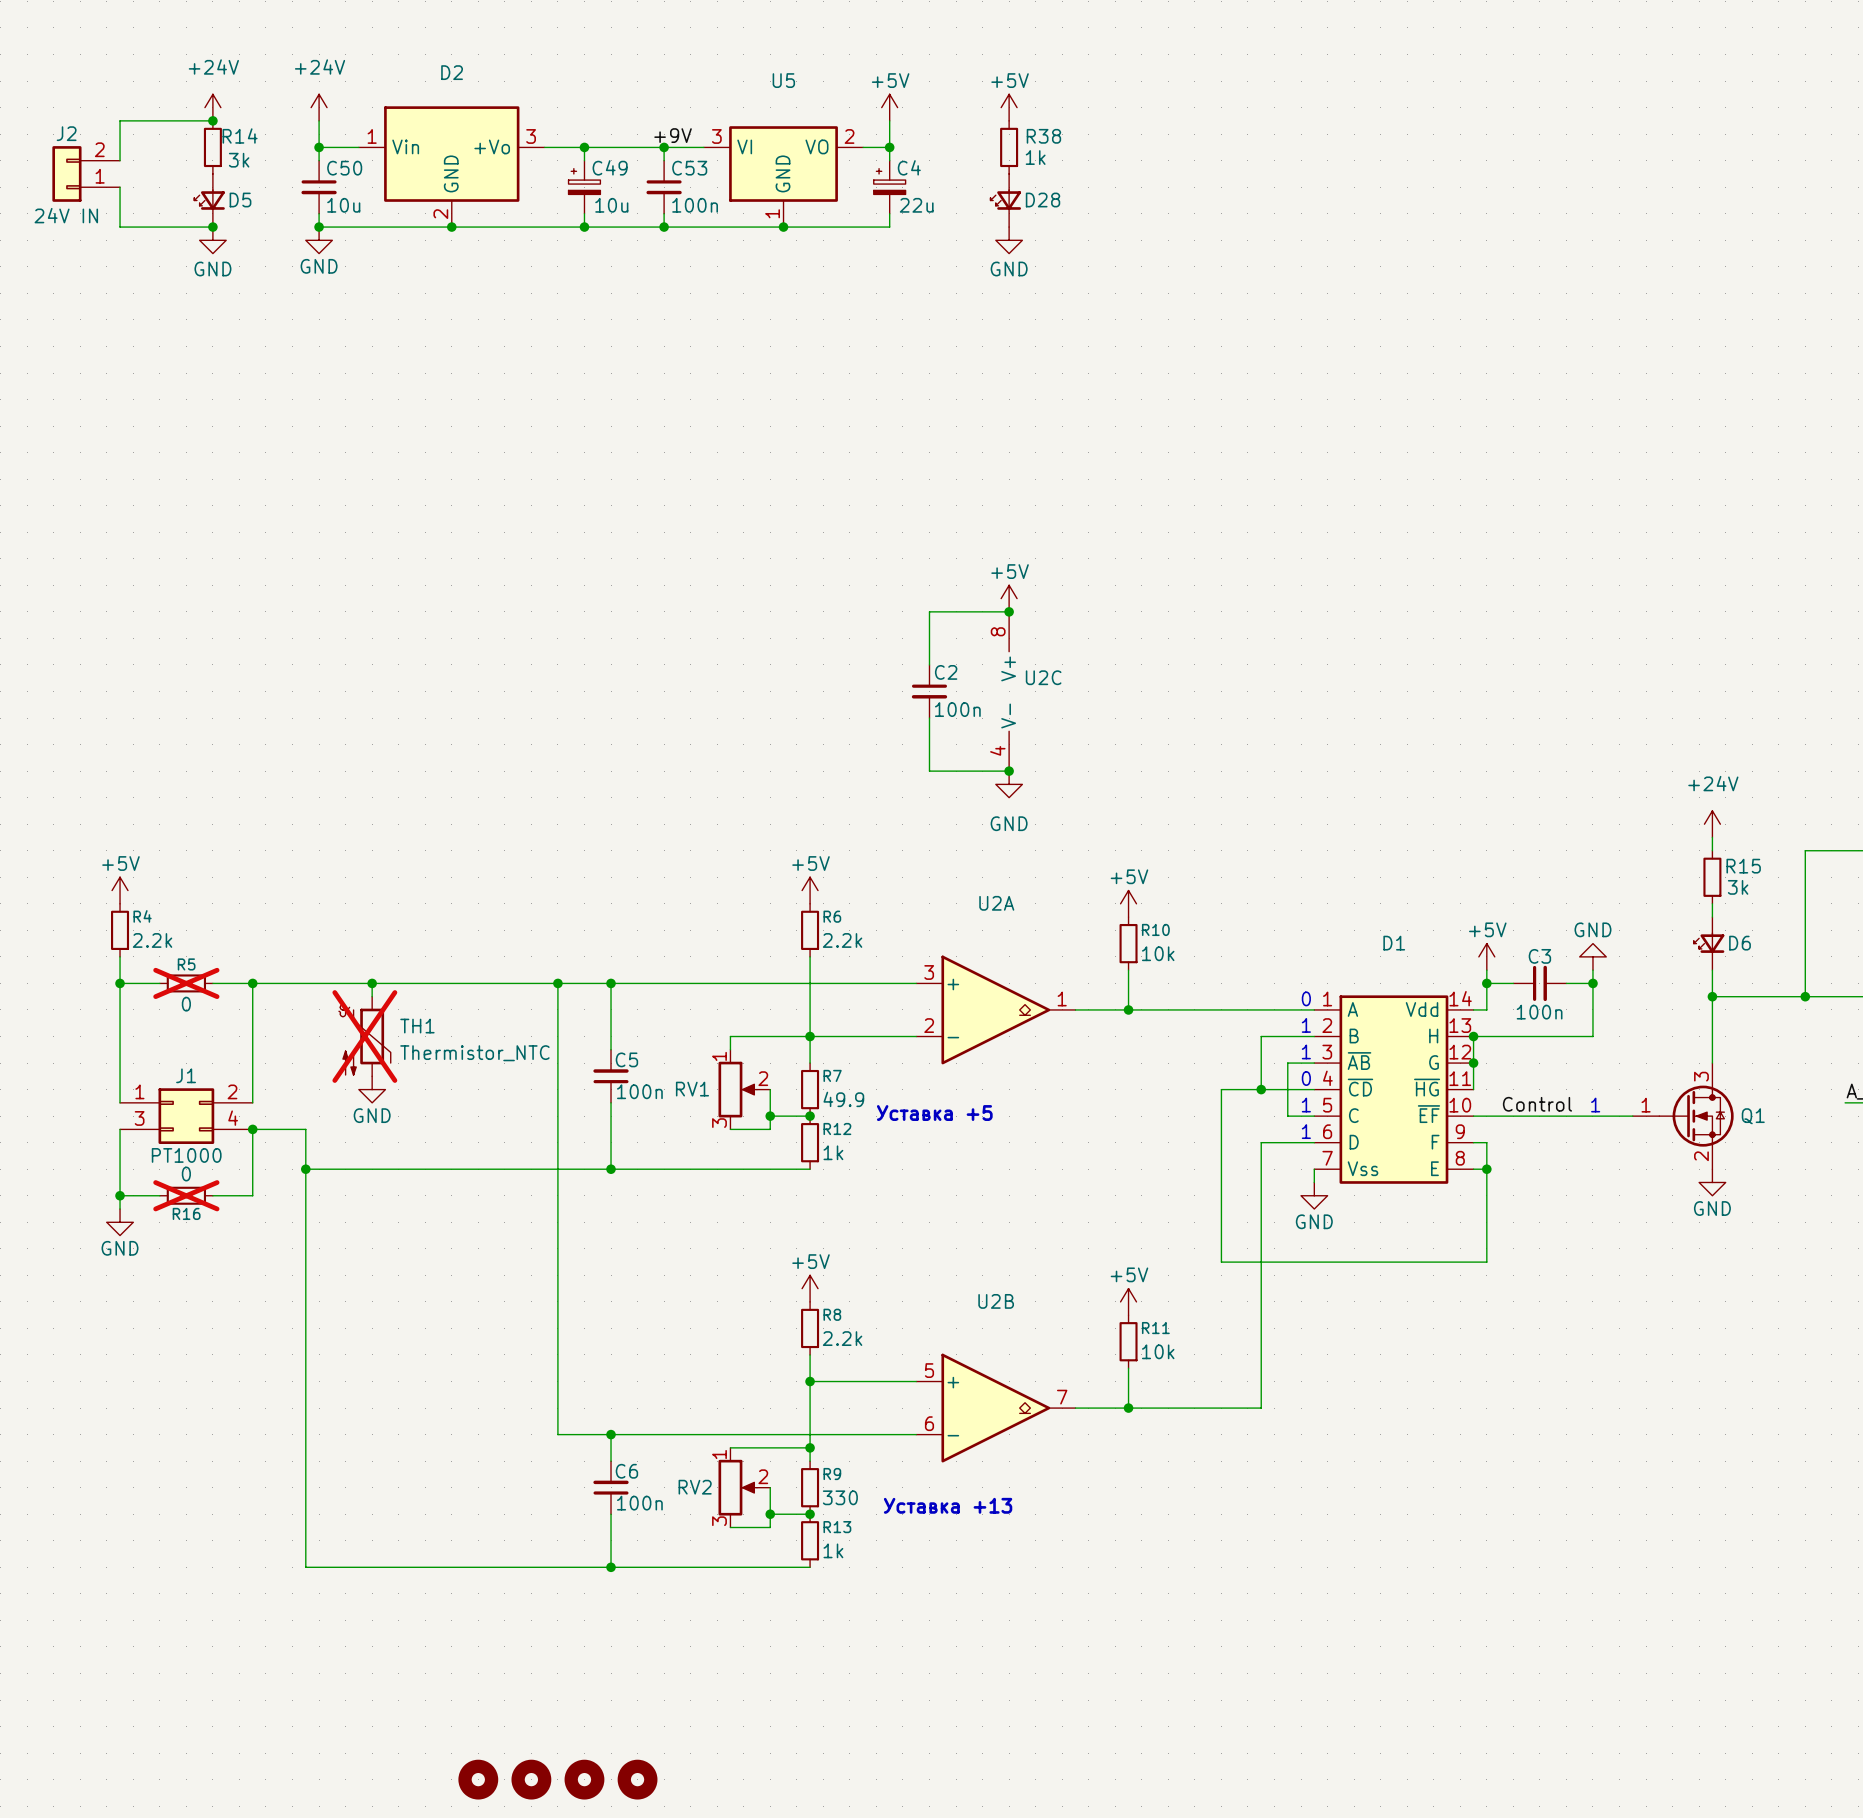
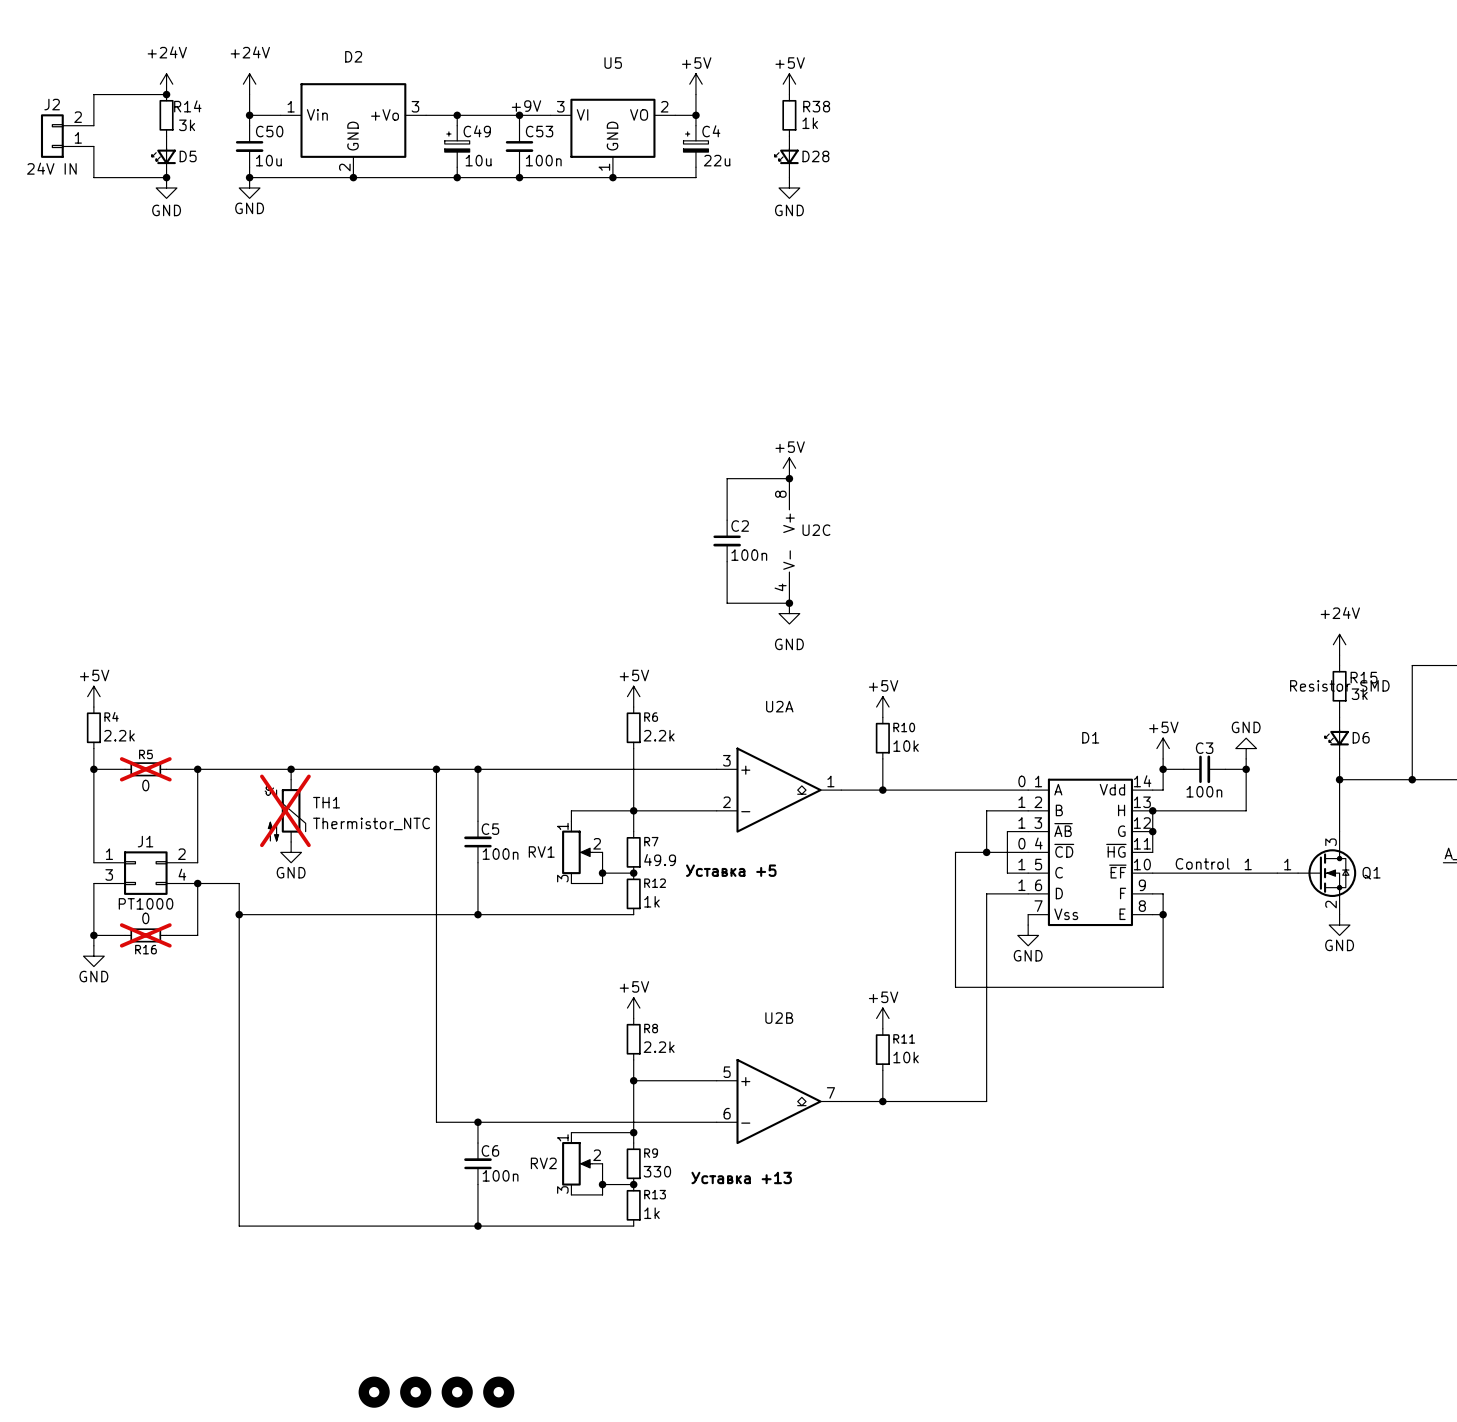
R15 text: none -> Resistor SMD (1339, 685)

